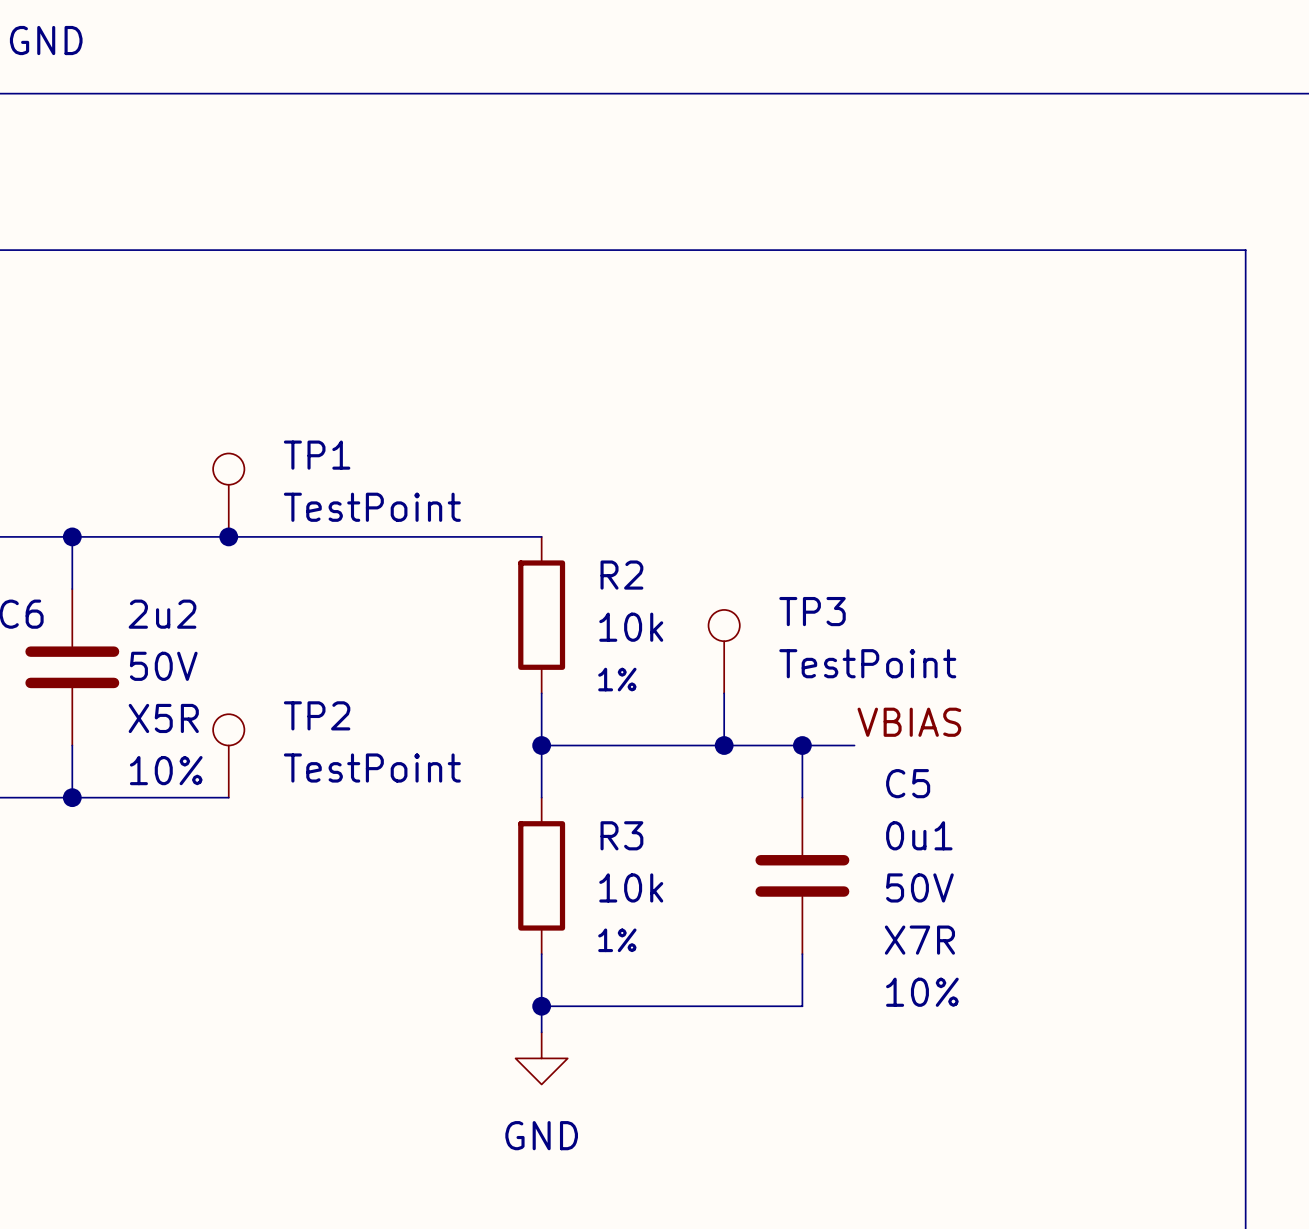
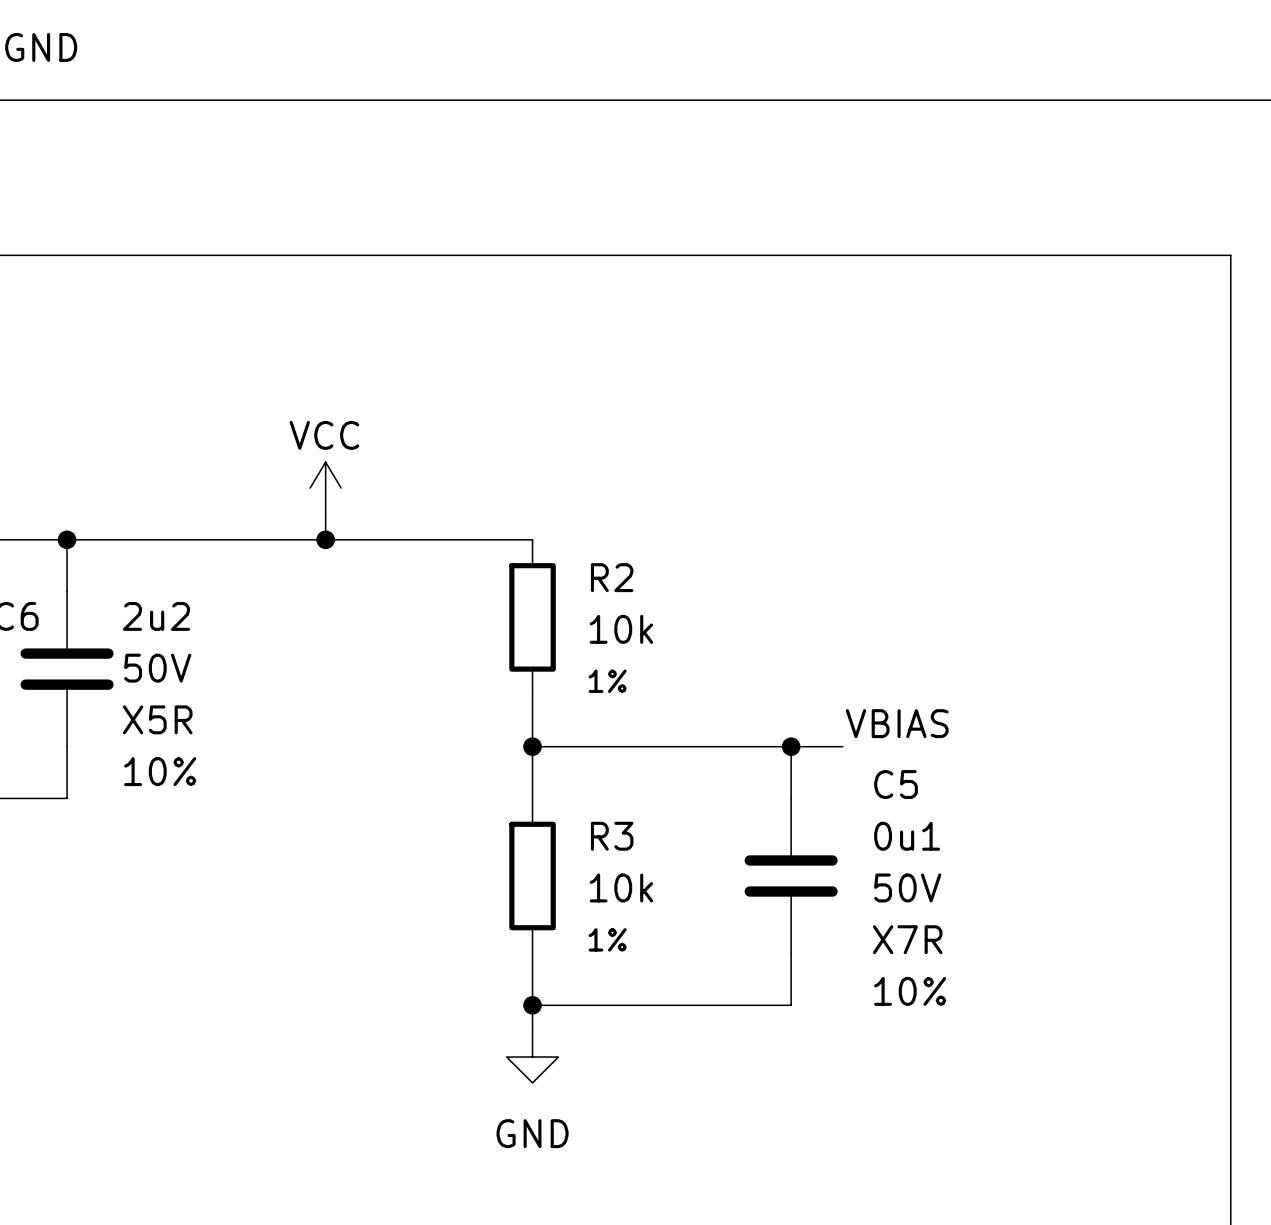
power symbol: none -> VCC (325, 488)
TP1: TestPoint (228, 495) -> none
wire: none -> (325, 513) (325, 539)
junction position: (228, 536) -> (325, 539)
TP3: TestPoint (724, 651) -> none
wire: (724, 693) (724, 745) -> none
junction: (724, 745) -> none
TP2: TestPoint (228, 755) -> none
wire: (72, 797) (228, 797) -> none
junction: (72, 797) -> none

